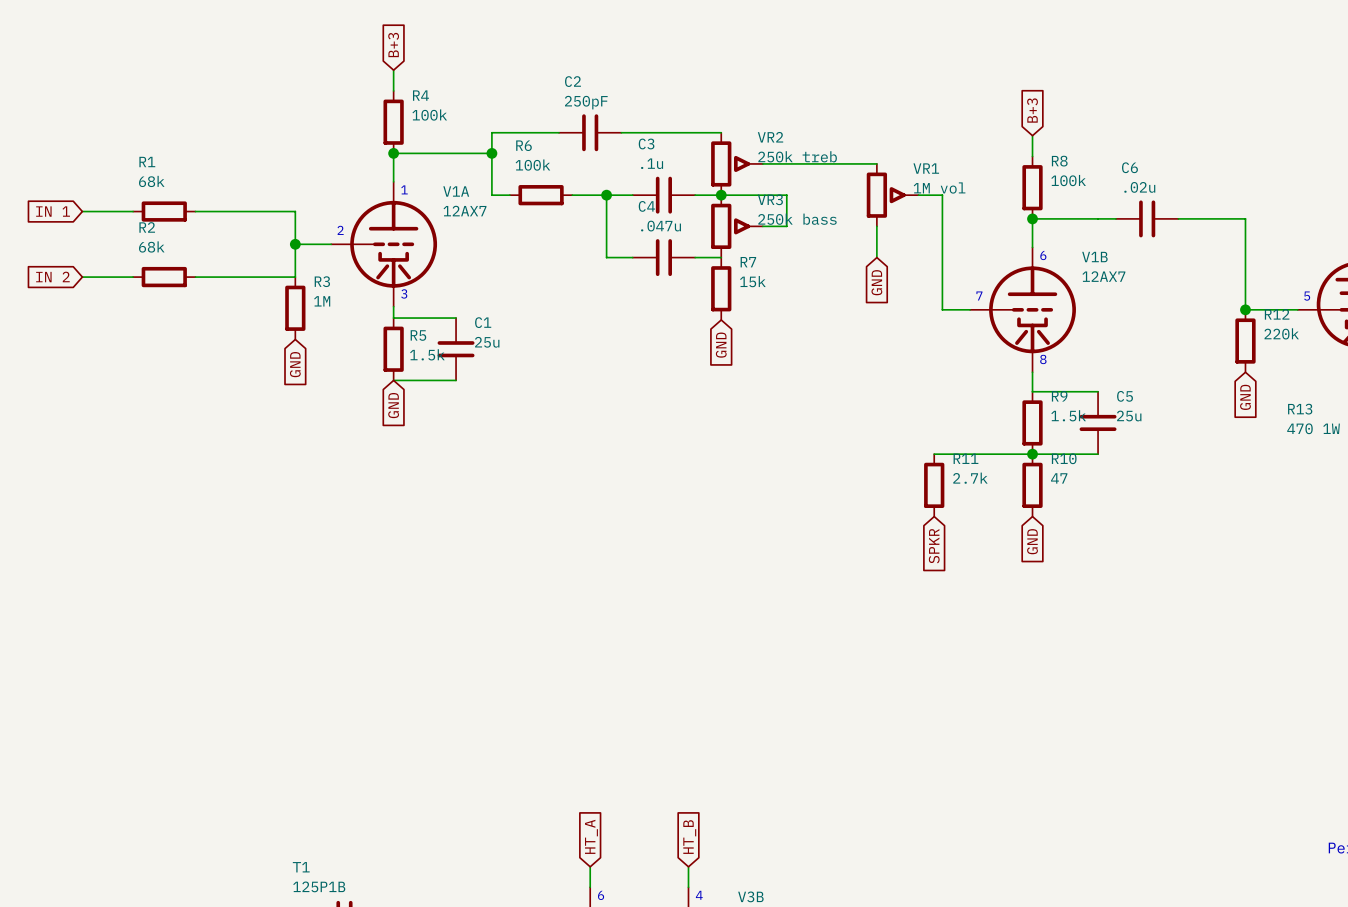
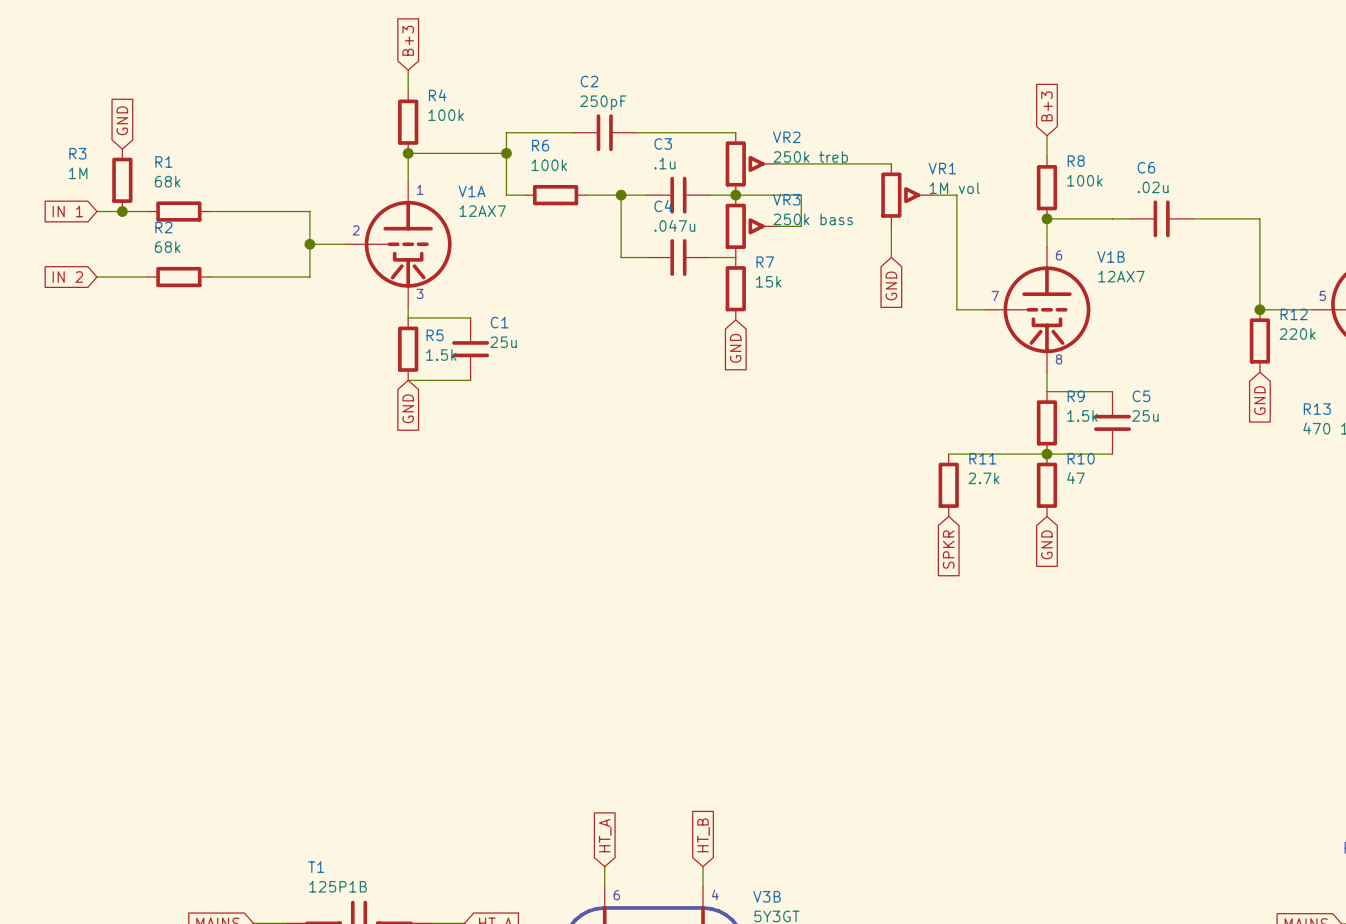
global label: none -> GND (122, 120)
junction: none -> (122, 211)
R3 name position: R3 (322, 281) -> R3 (77, 153)
R3 value position: 1M (322, 301) -> 1M (78, 173)
R3 position: (295, 308) -> (122, 180)
global label: GND (295, 364) -> none

